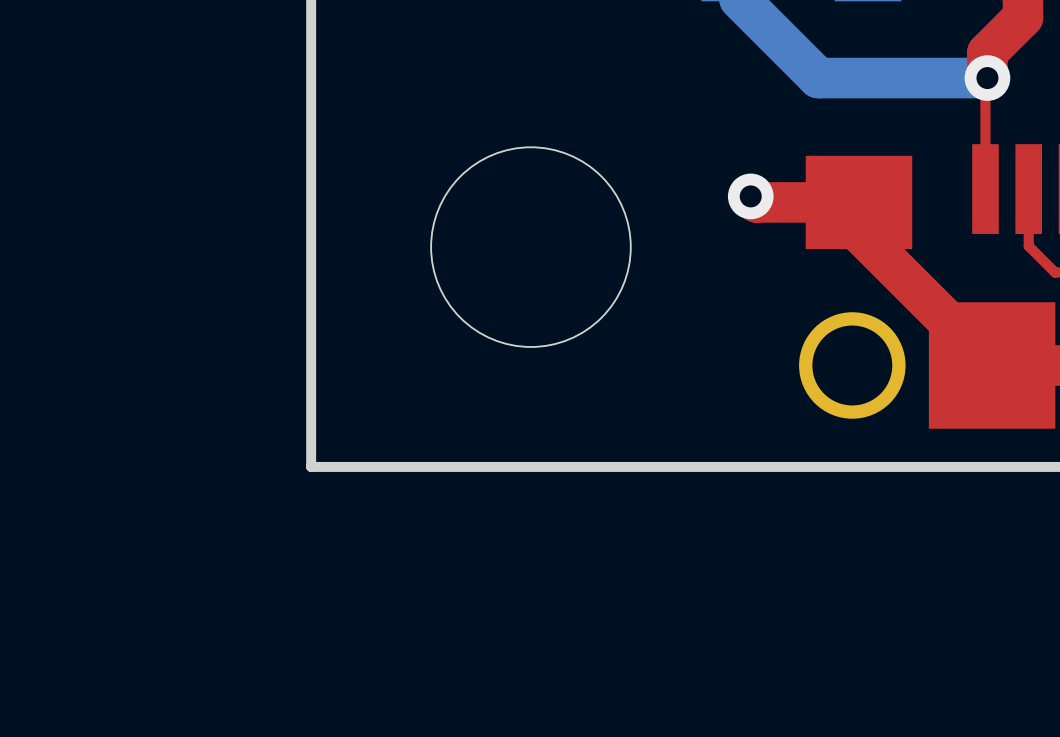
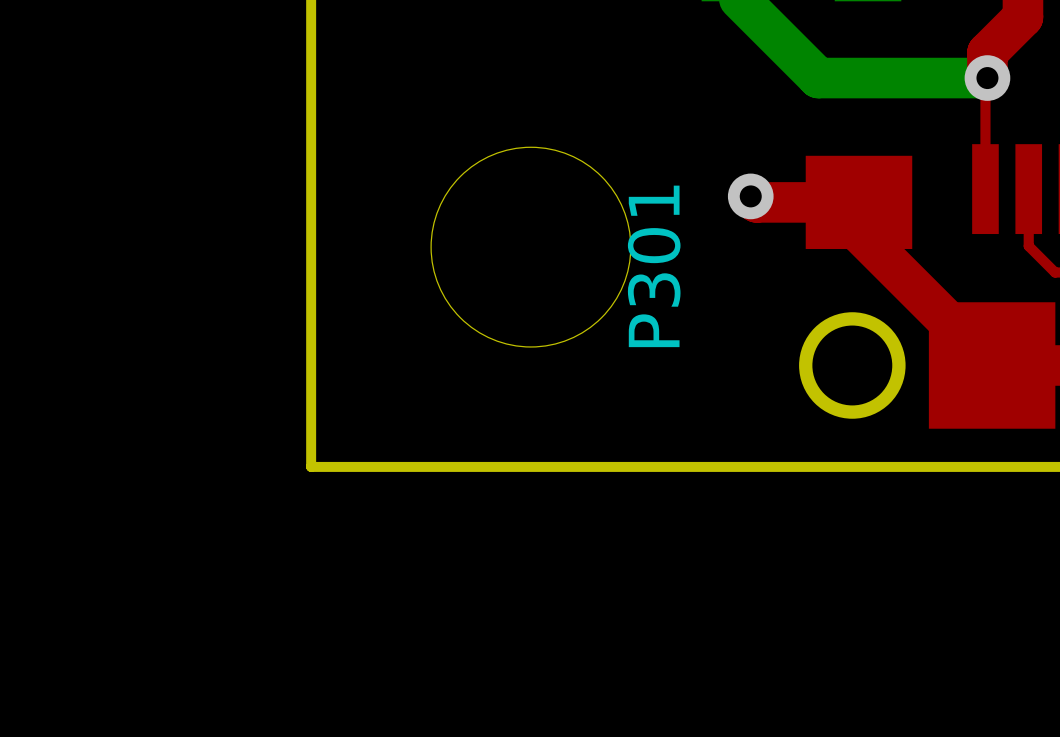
P301 name: none -> P301 (654, 266)

